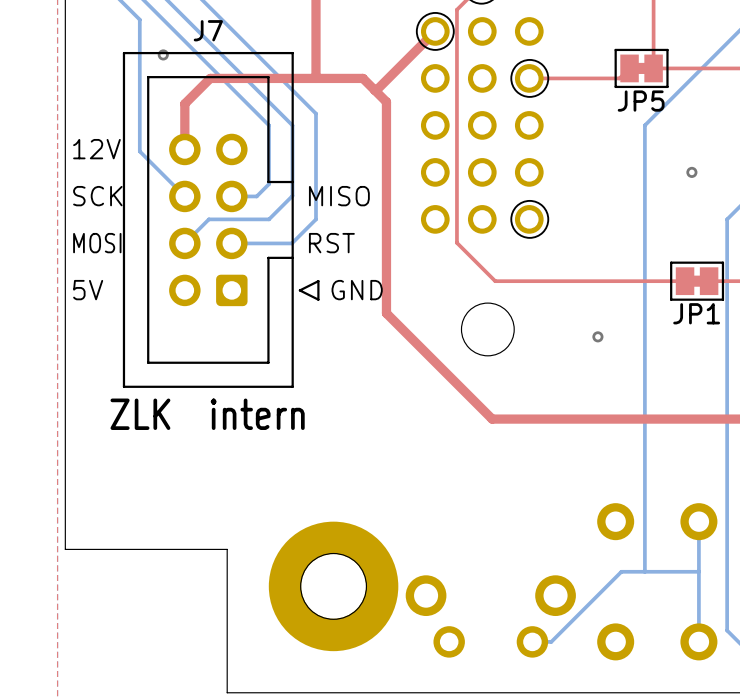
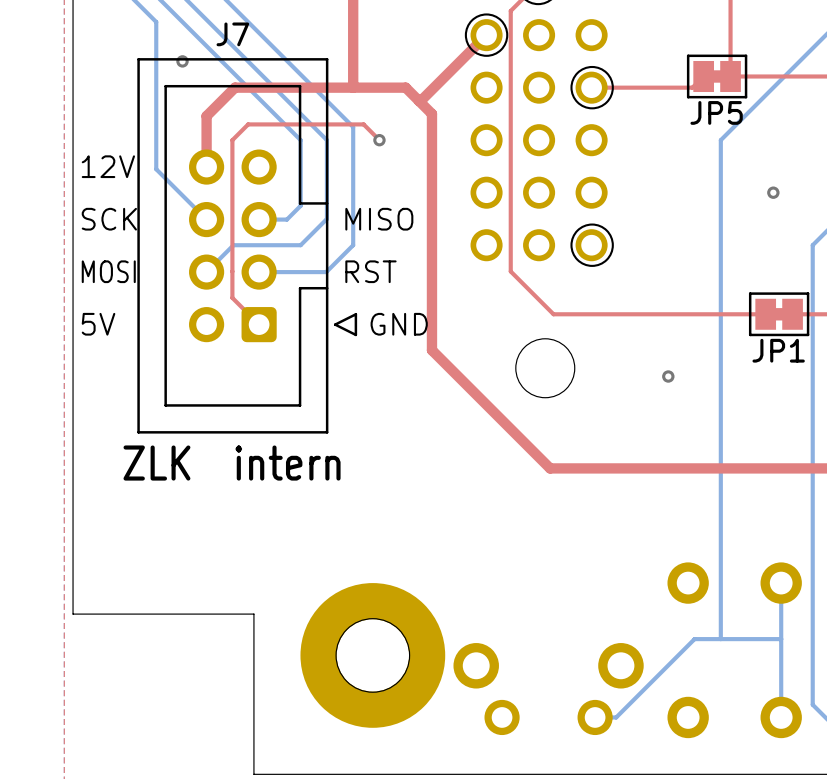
top track: none -> (379, 140) (363, 124) (248, 124) (232, 140) (232, 297) (259, 324)
via: none -> (379, 140)

